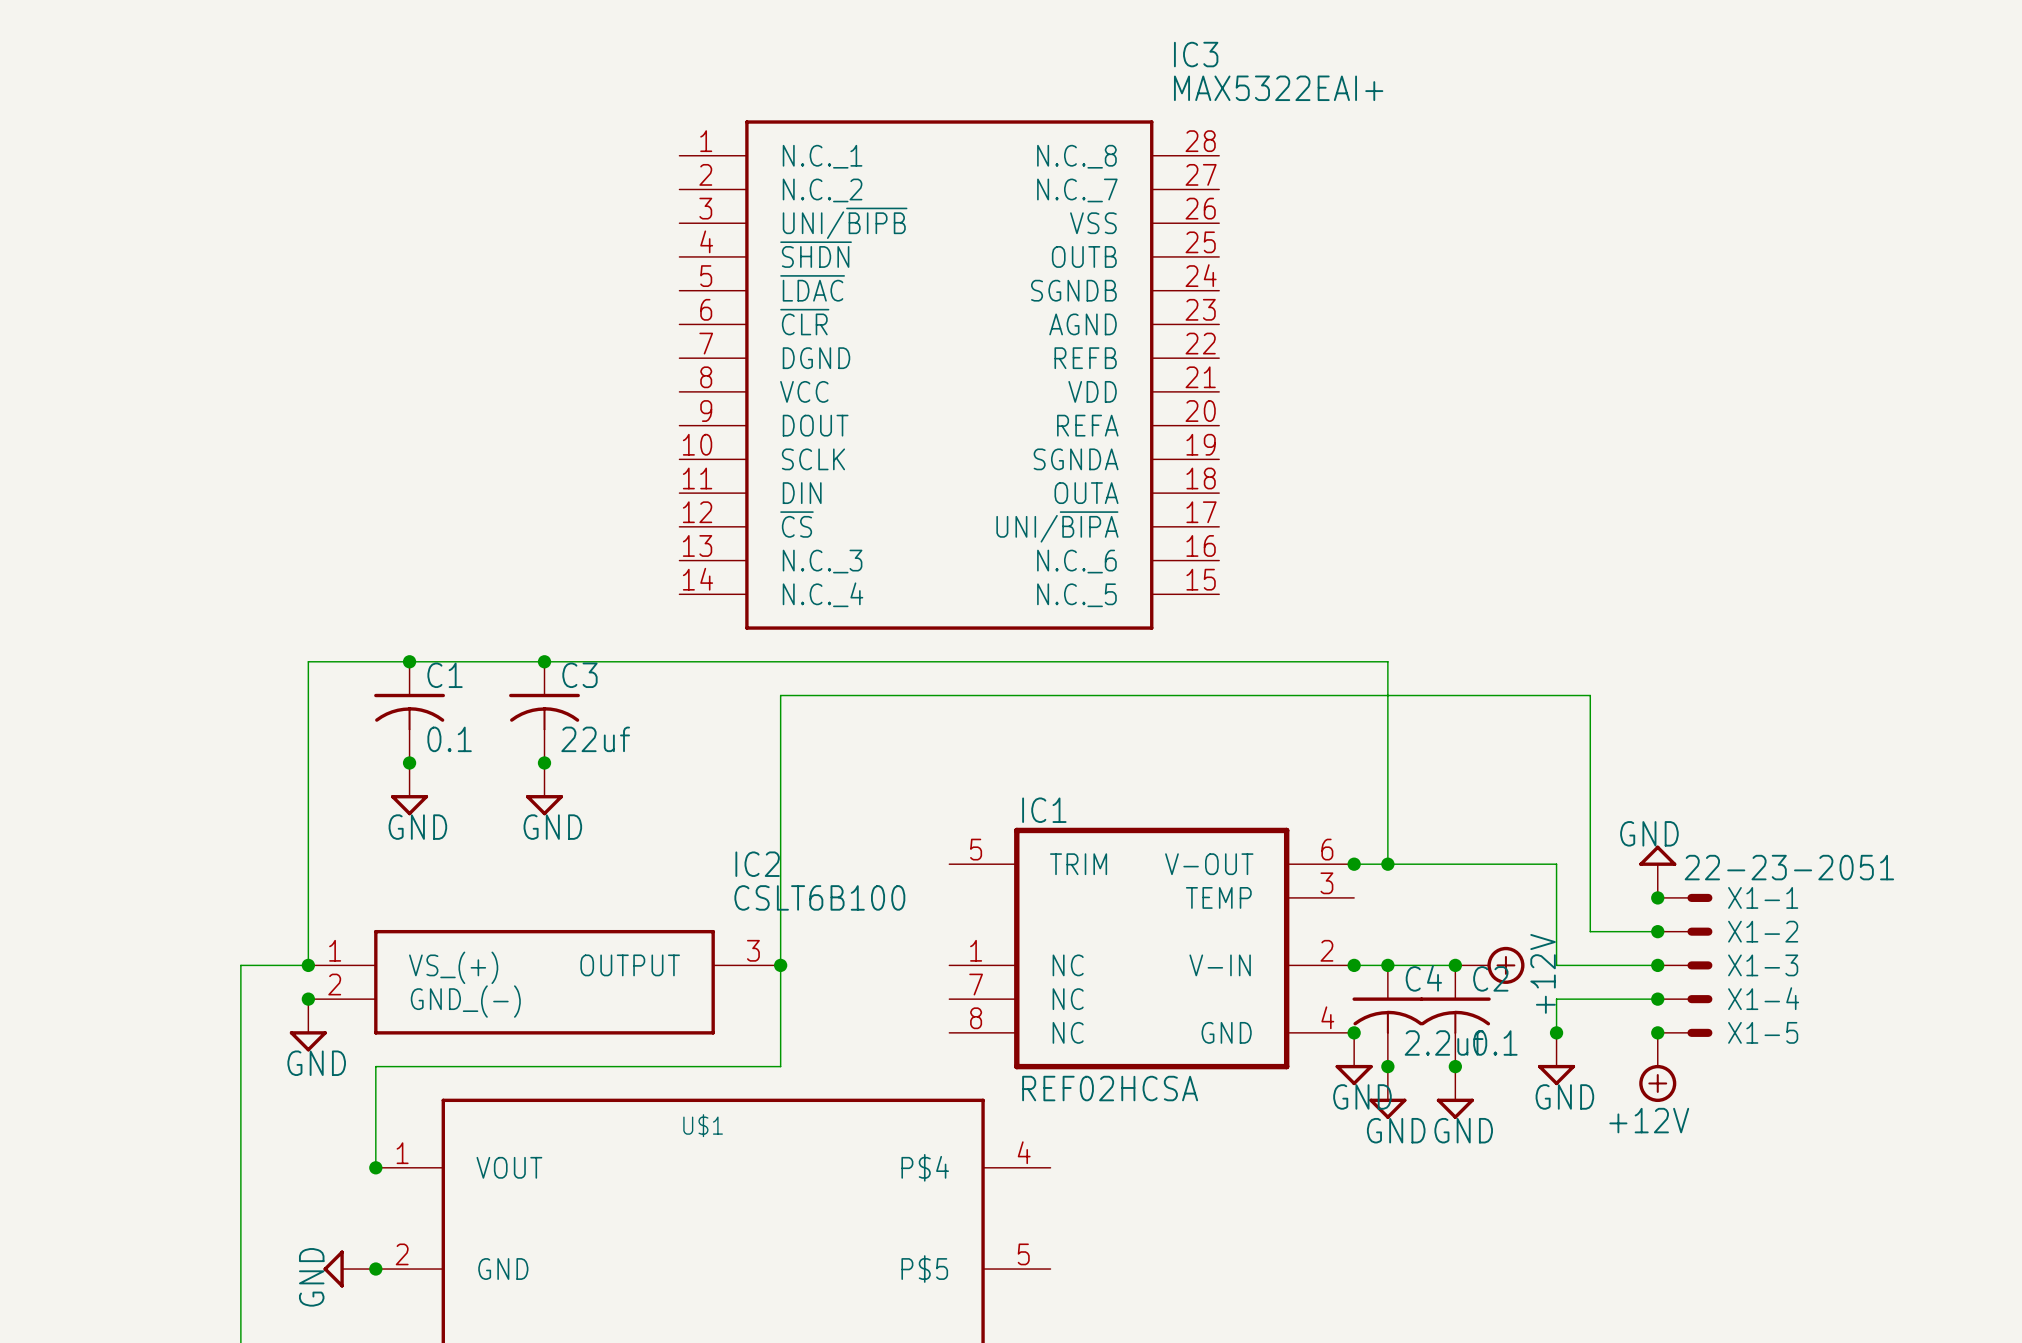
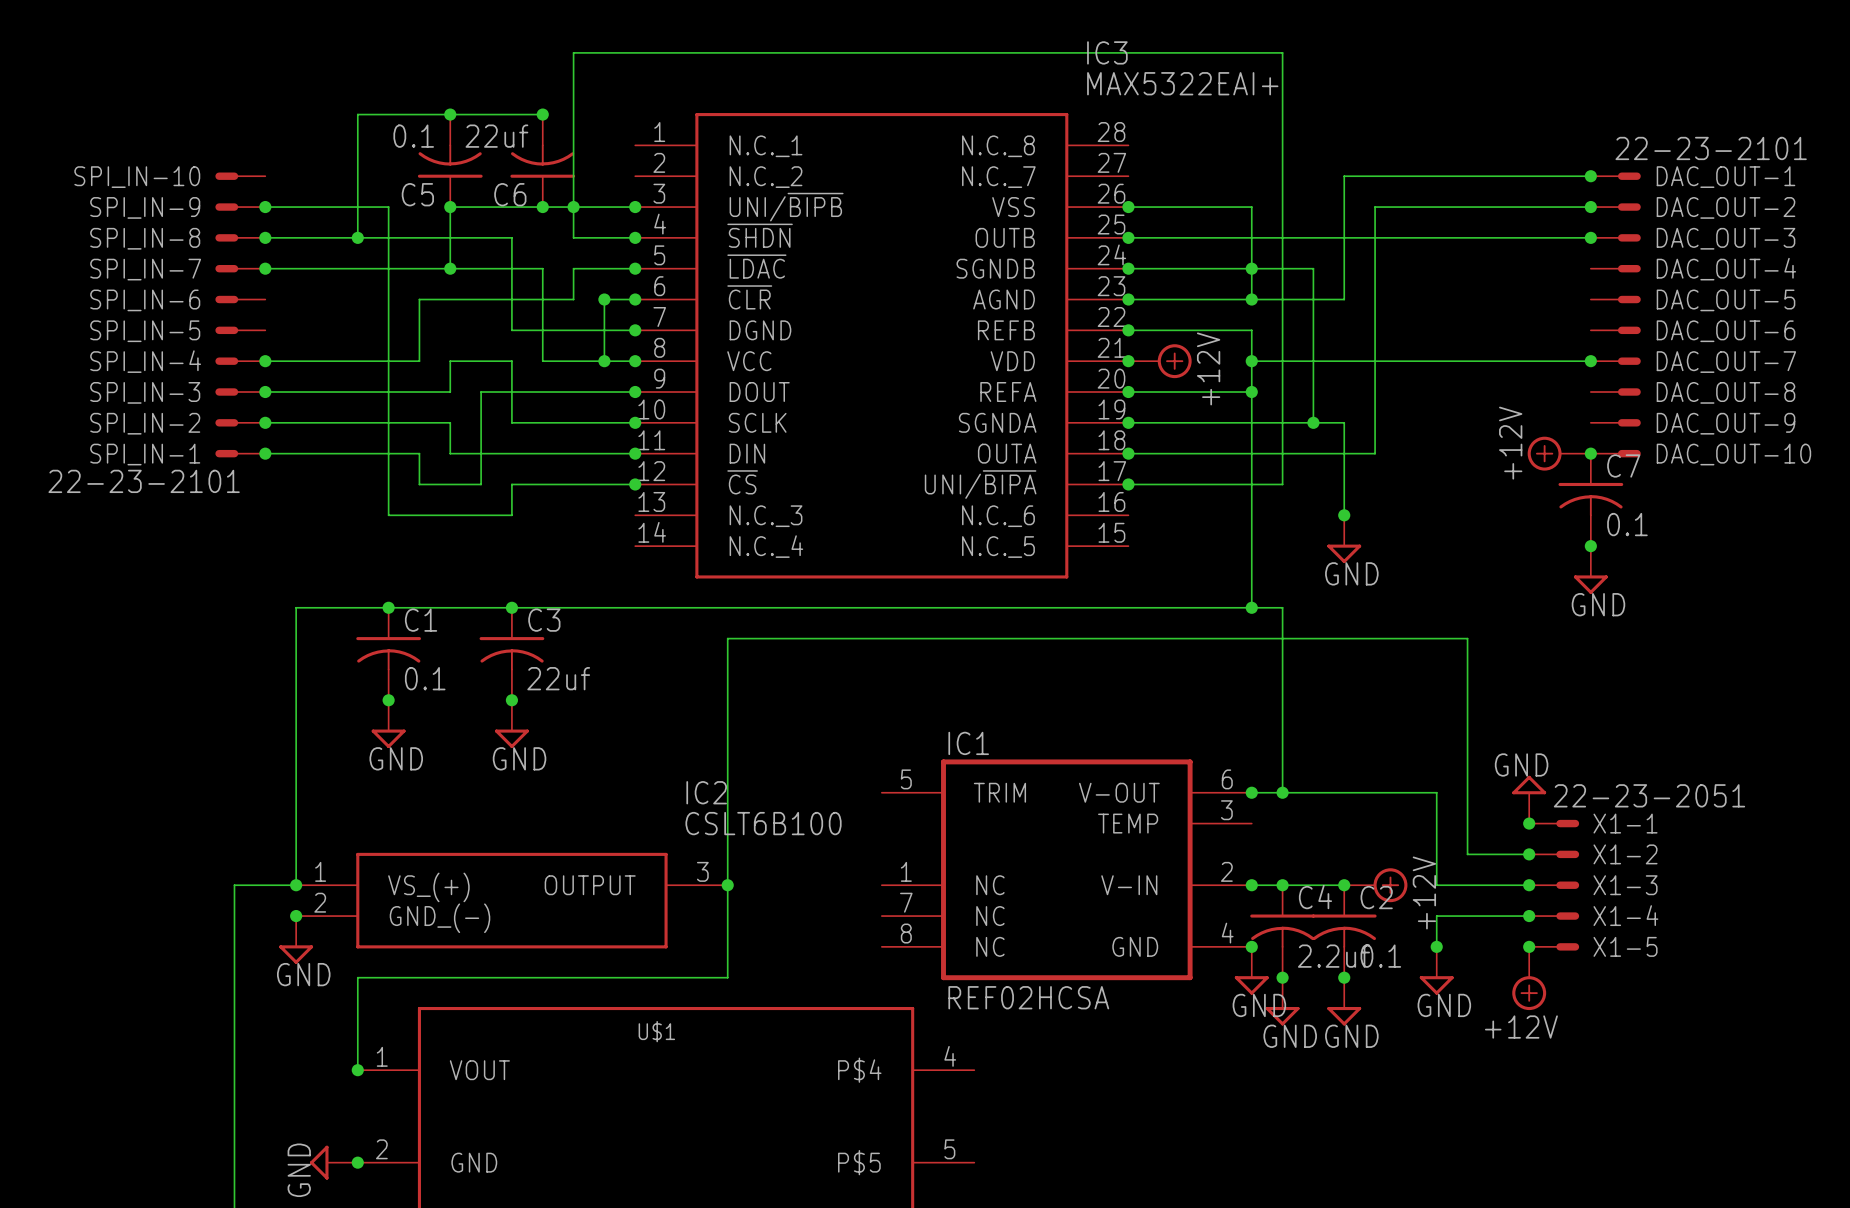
junction: none -> (450, 114)
wire: none -> (542, 114) (357, 114) (357, 237)
junction: none -> (542, 114)
C5: none -> 0.1 (450, 160)
C6: none -> 22uf (542, 160)
SPI_IN-10: none -> (240, 176)
wire: none -> (1590, 176) (1344, 176) (1344, 299) (1128, 299)
junction: none -> (1590, 176)
DAC_OUT-1: none -> 22-23-2101 (1615, 176)
SPI_IN-9: none -> (240, 207)
wire: none -> (265, 207) (388, 207) (388, 515) (511, 515) (511, 484) (635, 484)
junction: none -> (265, 207)
junction: none -> (450, 207)
junction: none -> (542, 207)
junction: none -> (573, 207)
wire: none -> (635, 207) (450, 207) (450, 268)
junction: none -> (635, 207)
wire: none -> (1128, 207) (1251, 207) (1251, 299)
junction: none -> (1128, 207)
wire: none -> (1590, 207) (1375, 207) (1375, 453) (1128, 453)
junction: none -> (1590, 207)
DAC_OUT-2: none -> (1615, 207)
SPI_IN-8: none -> (240, 237)
wire: none -> (265, 237) (511, 237) (511, 330) (635, 330)
junction: none -> (265, 237)
junction: none -> (357, 237)
wire: none -> (635, 237) (573, 237) (573, 52) (1282, 52) (1282, 484) (1128, 484)
junction: none -> (635, 237)
wire: none -> (1128, 237) (1590, 237)
junction: none -> (1128, 237)
junction: none -> (1590, 237)
DAC_OUT-3: none -> (1615, 237)
SPI_IN-7: none -> (240, 268)
wire: none -> (265, 268) (542, 268) (542, 361) (635, 361)
junction: none -> (265, 268)
junction: none -> (450, 268)
wire: none -> (635, 268) (573, 268) (573, 299) (419, 299) (419, 361) (265, 361)
junction: none -> (635, 268)
wire: none -> (1128, 268) (1313, 268) (1313, 422)
junction: none -> (1128, 268)
junction: none -> (1251, 268)
DAC_OUT-4: none -> (1615, 268)
SPI_IN-6: none -> (240, 299)
junction: none -> (604, 299)
wire: none -> (635, 299) (604, 299) (604, 361)
junction: none -> (635, 299)
junction: none -> (1128, 299)
junction: none -> (1251, 299)
DAC_OUT-5: none -> (1615, 299)
SPI_IN-5: none -> (240, 330)
junction: none -> (635, 330)
wire: none -> (1128, 330) (1251, 330) (1251, 607)
junction: none -> (1128, 330)
DAC_OUT-6: none -> (1615, 330)
SPI_IN-4: none -> (240, 361)
junction: none -> (265, 361)
junction: none -> (604, 361)
junction: none -> (635, 361)
junction: none -> (1128, 361)
power symbol: none -> +12V (1160, 361)
wire: none -> (1251, 361) (1590, 361)
junction: none -> (1251, 361)
junction: none -> (1590, 361)
DAC_OUT-7: none -> (1615, 361)
SPI_IN-3: none -> (240, 392)
wire: none -> (265, 392) (450, 392) (450, 361) (511, 361) (511, 422) (635, 422)
junction: none -> (265, 392)
wire: none -> (635, 392) (481, 392) (481, 484) (419, 484) (419, 453) (265, 453)
junction: none -> (635, 392)
wire: none -> (1128, 392) (1251, 392)
junction: none -> (1128, 392)
junction: none -> (1251, 392)
DAC_OUT-8: none -> (1615, 392)
SPI_IN-2: none -> (240, 422)
wire: none -> (265, 422) (450, 422) (450, 453) (635, 453)
junction: none -> (265, 422)
junction: none -> (635, 422)
wire: none -> (1128, 422) (1344, 422) (1344, 515)
junction: none -> (1128, 422)
junction: none -> (1313, 422)
DAC_OUT-9: none -> (1615, 422)
SPI_IN-1: none -> 22-23-2101 (240, 453)
junction: none -> (265, 453)
junction: none -> (635, 453)
junction: none -> (1128, 453)
power symbol: none -> +12V (1559, 453)
junction: none -> (1590, 453)
DAC_OUT-10: none -> (1615, 453)
junction: none -> (635, 484)
junction: none -> (1128, 484)
C7: none -> 0.1 (1590, 499)
junction: none -> (1344, 515)
power symbol: none -> GND (1344, 539)
junction: none -> (1590, 546)
power symbol: none -> GND (1590, 570)
junction: none -> (1251, 607)

